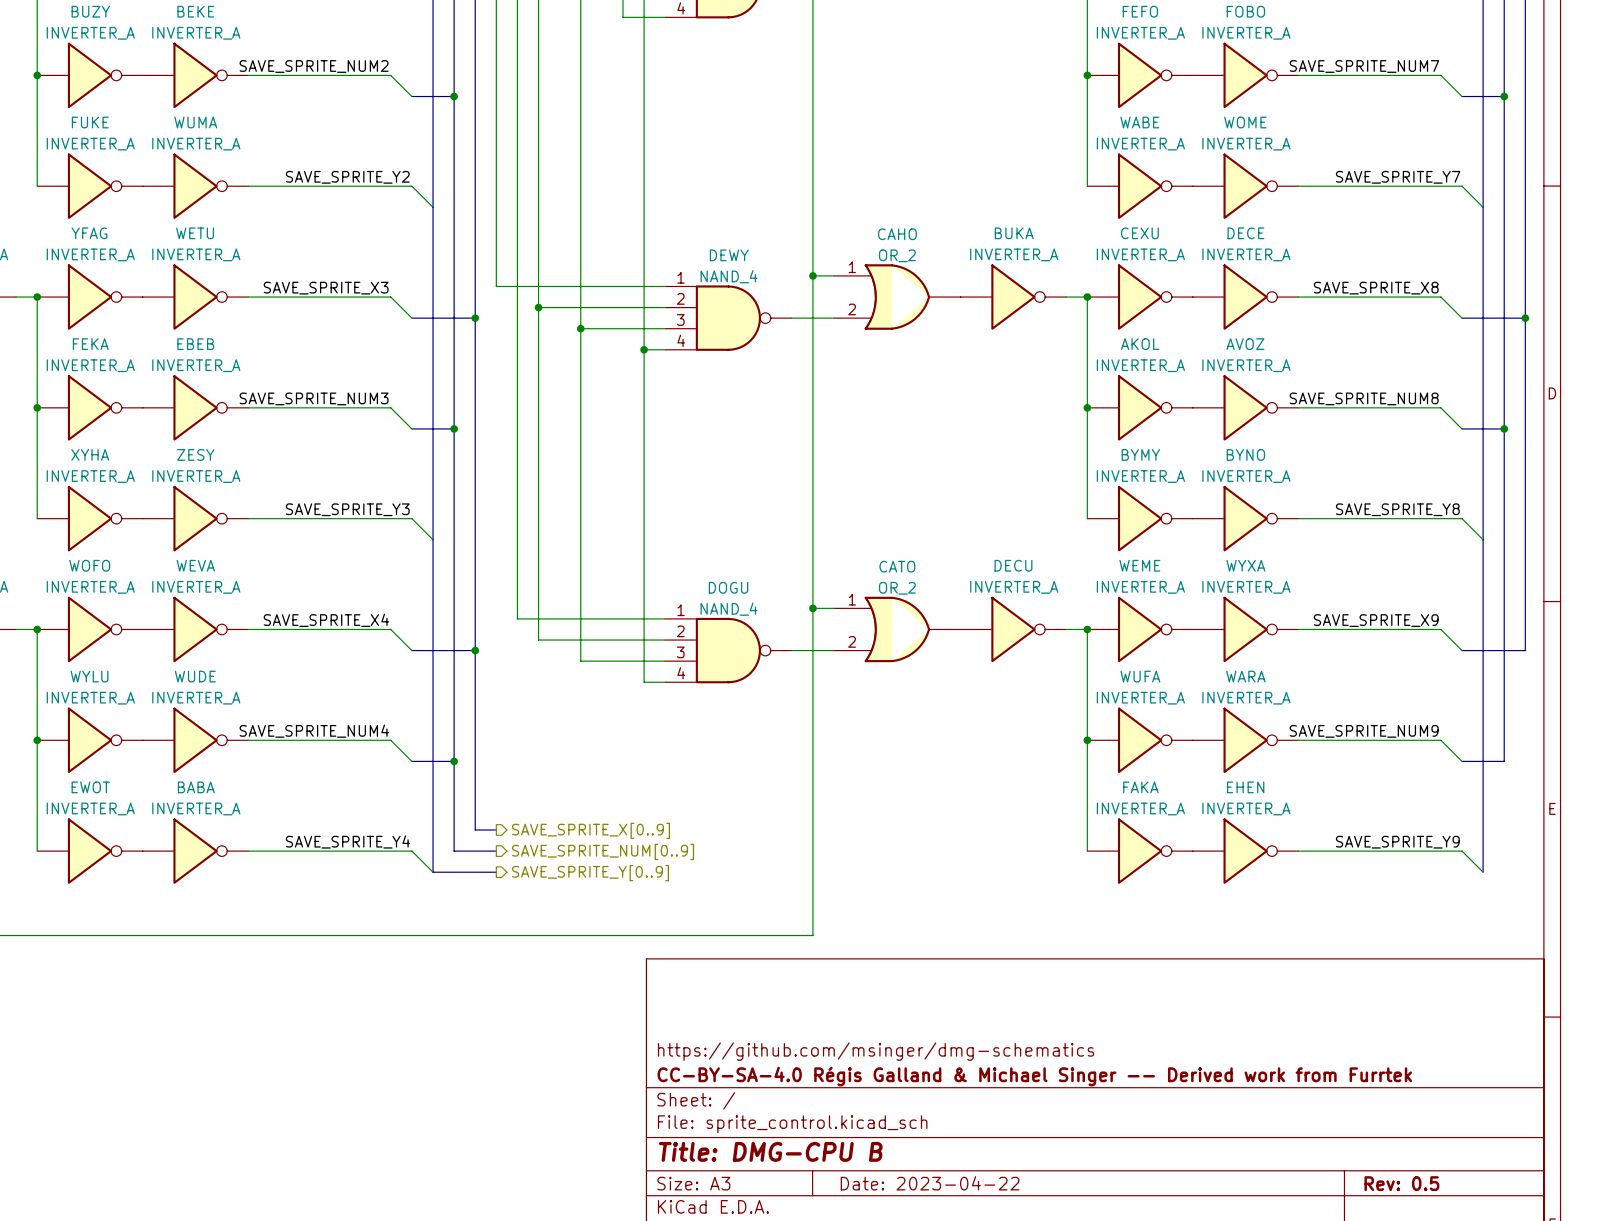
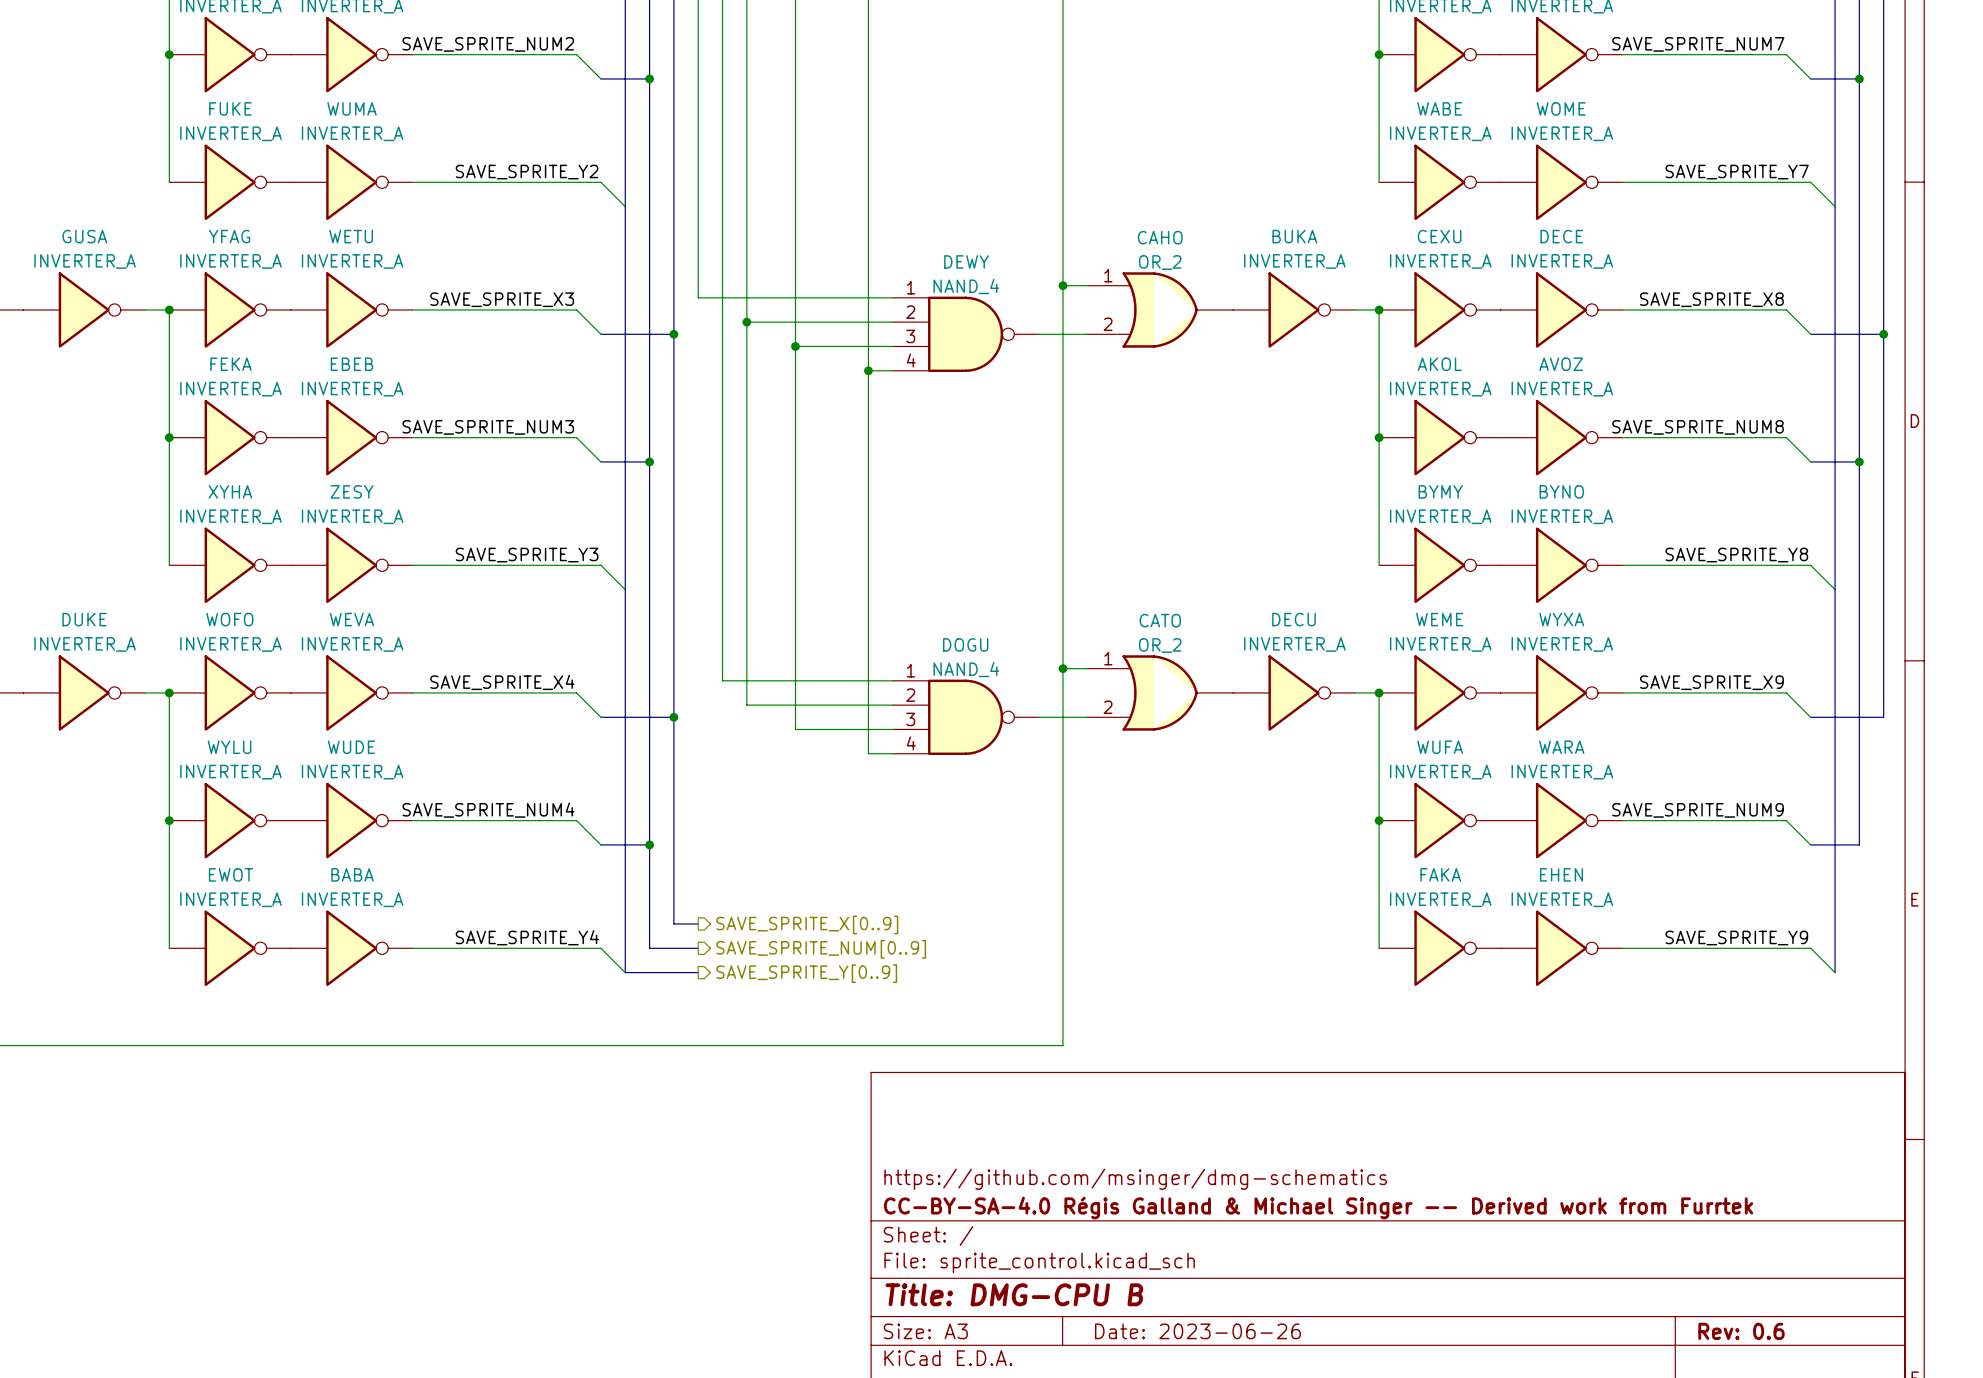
title block: Date: 2023-04-22 (930, 1183) -> Date: 2023-06-26 (1197, 1331)
title block: Rev: 0.5 (1401, 1183) -> Rev: 0.6 (1741, 1331)

